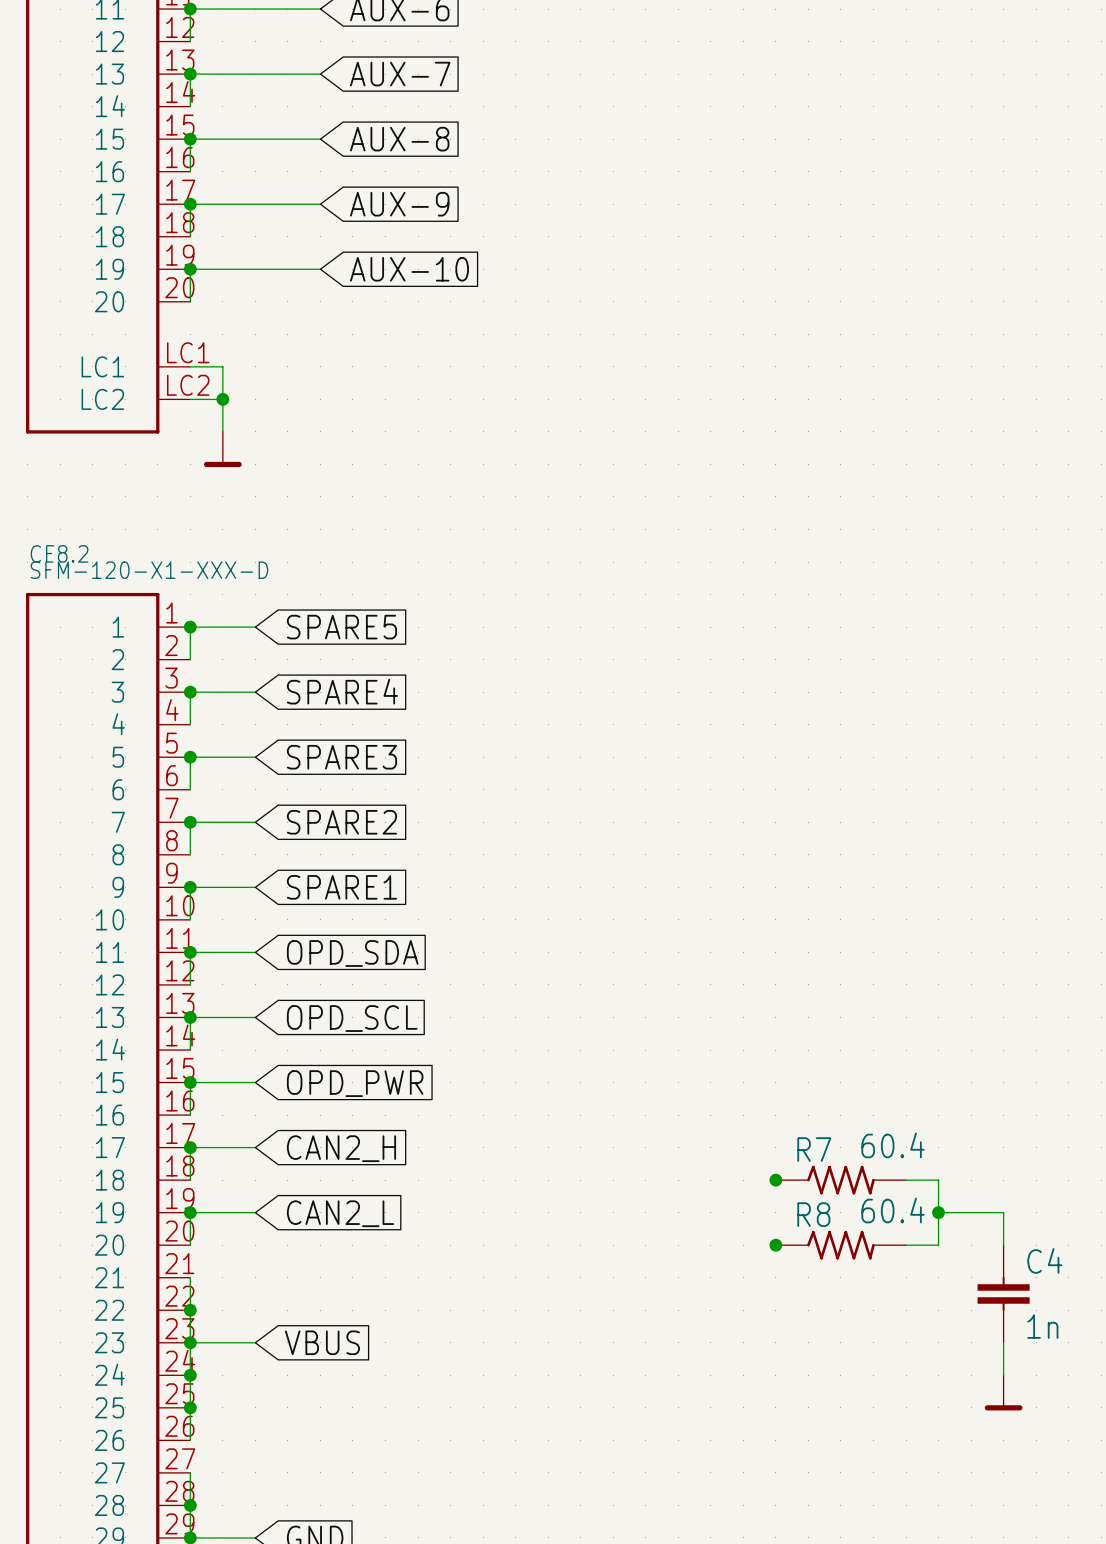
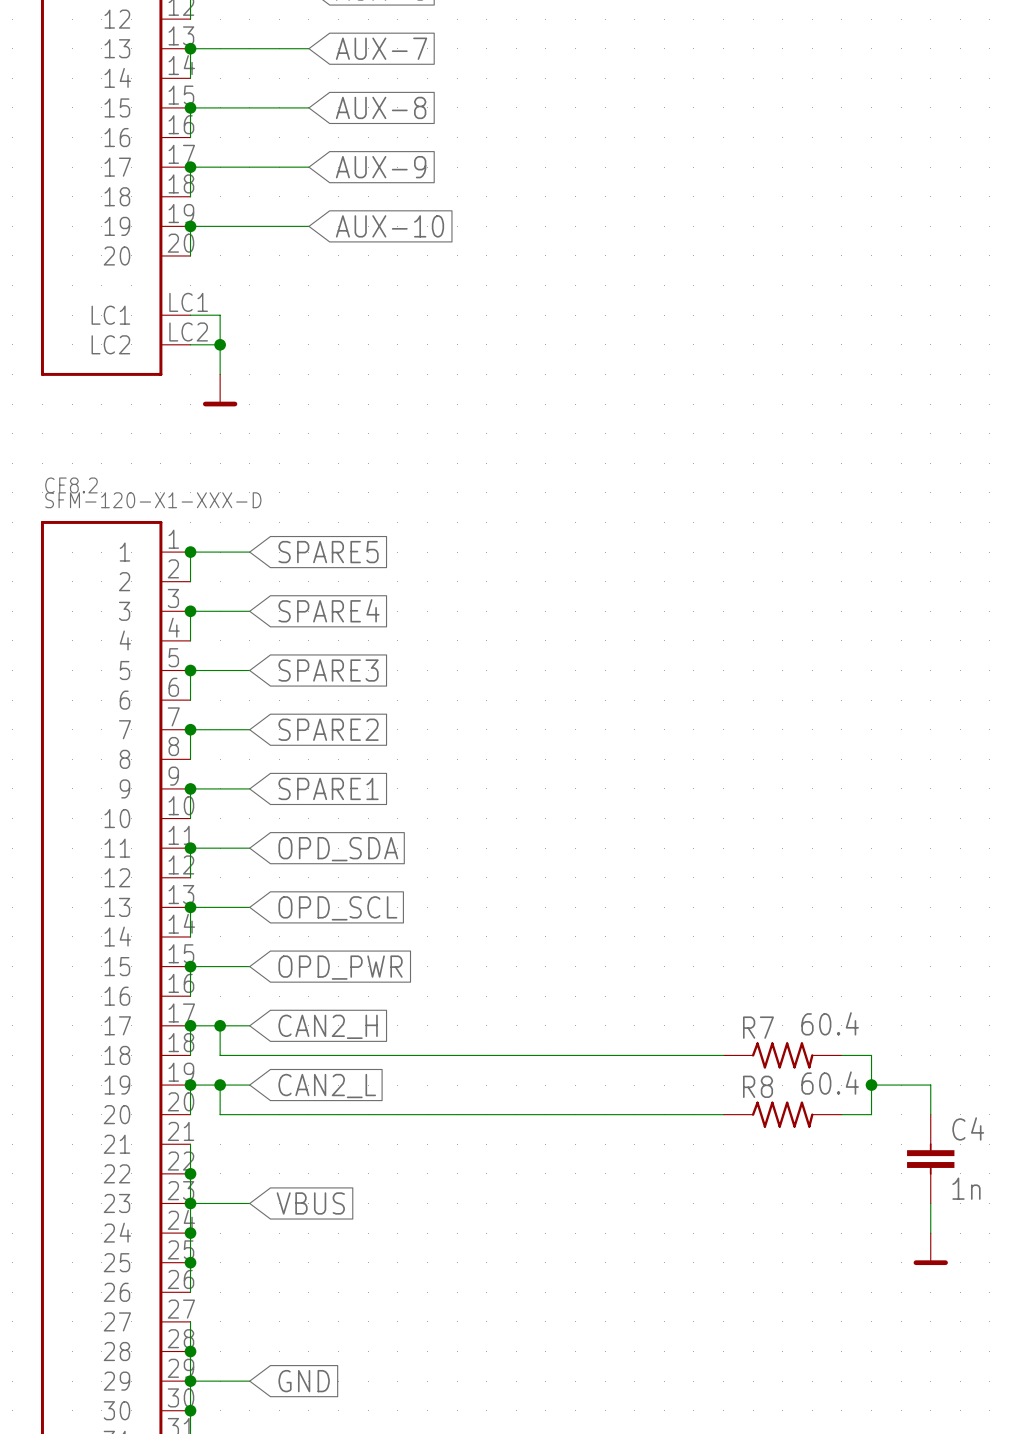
wire: none -> (220, 1025) (220, 1055) (723, 1055)
junction: none -> (220, 1025)
junction: (775, 1180) -> none
wire: none -> (220, 1085) (220, 1114) (723, 1114)
junction: none -> (220, 1085)
junction: (775, 1245) -> none

